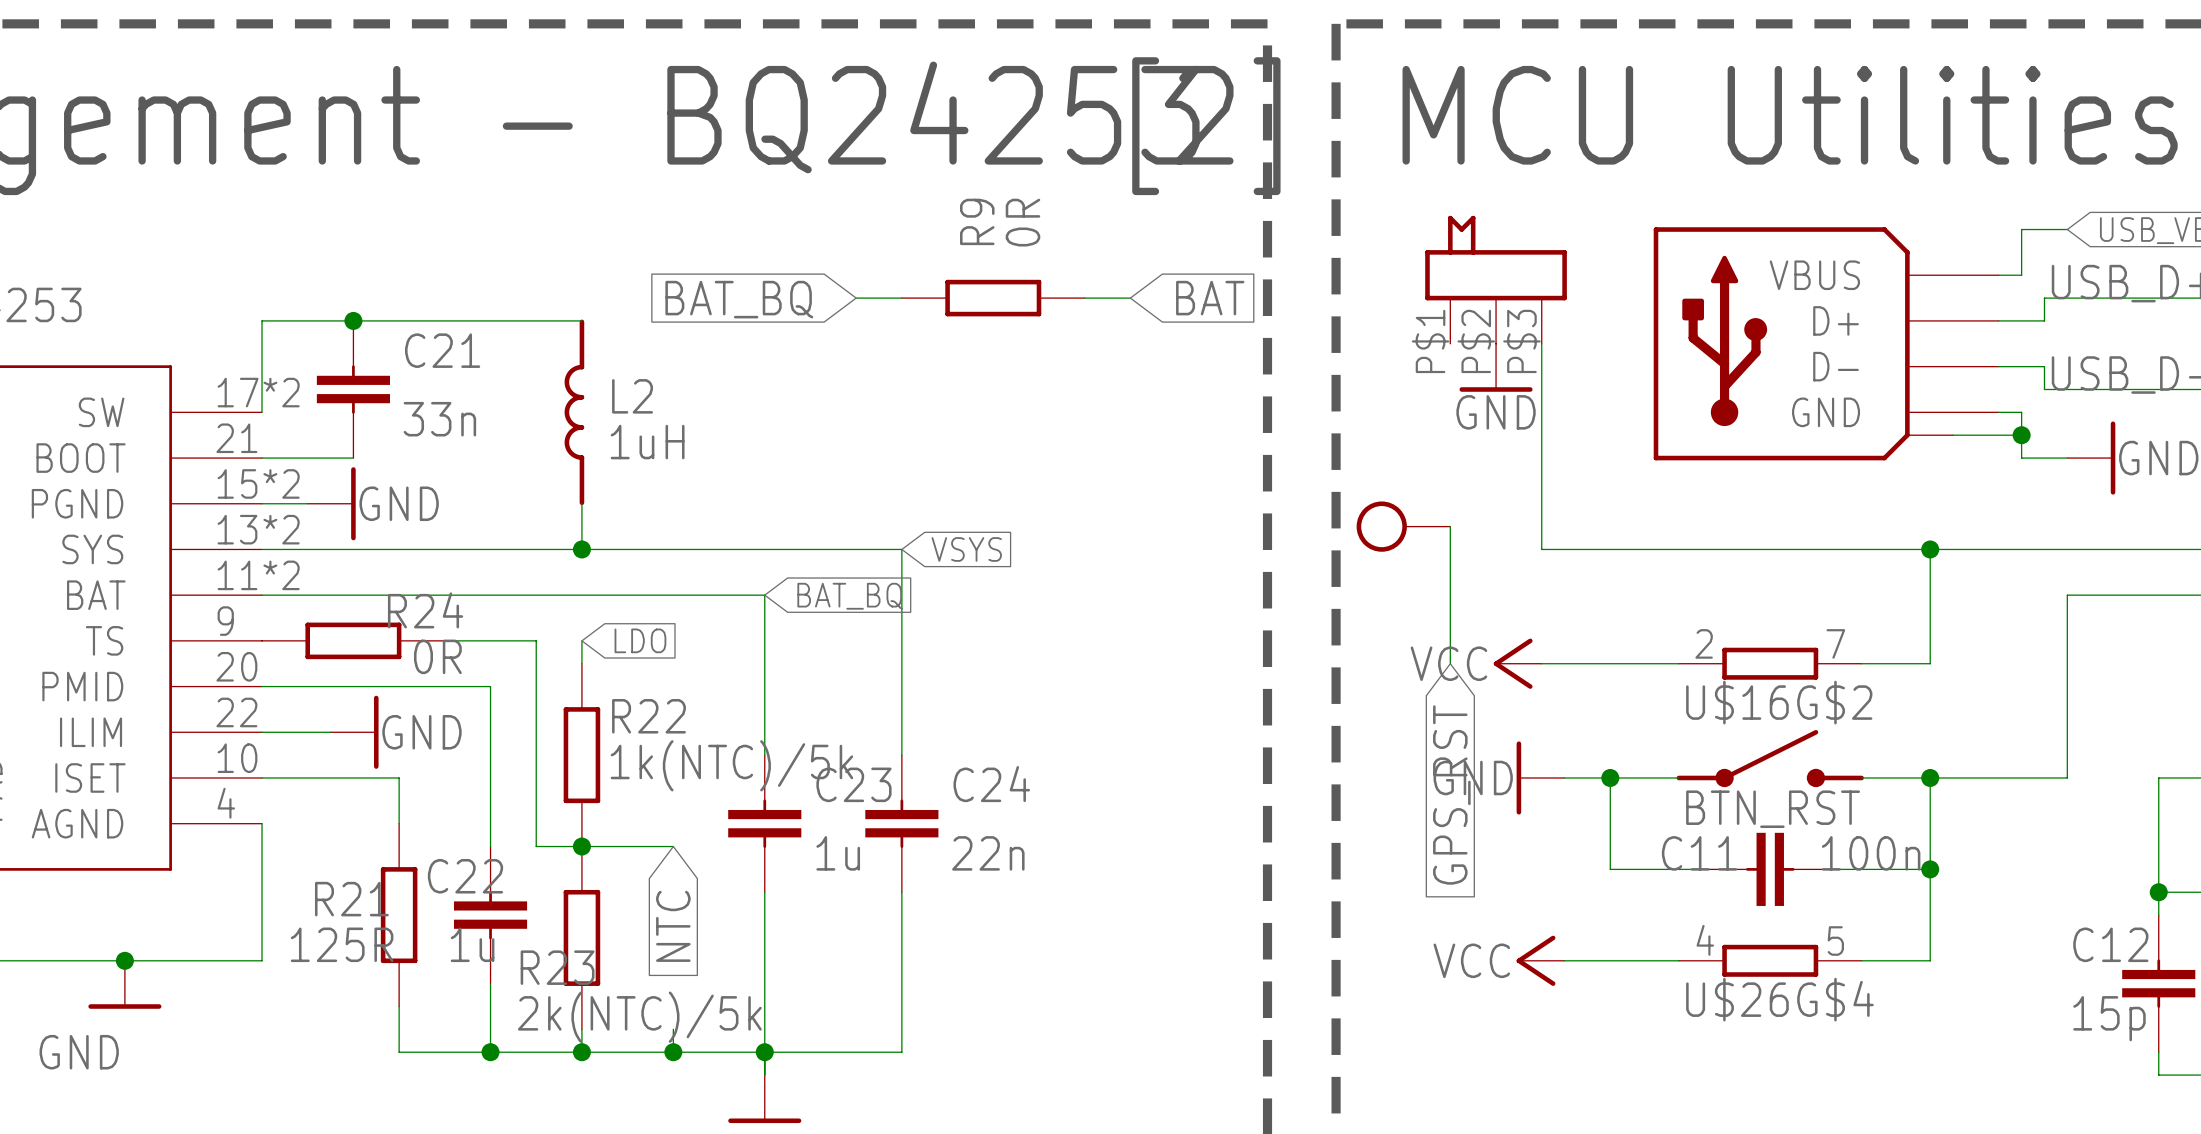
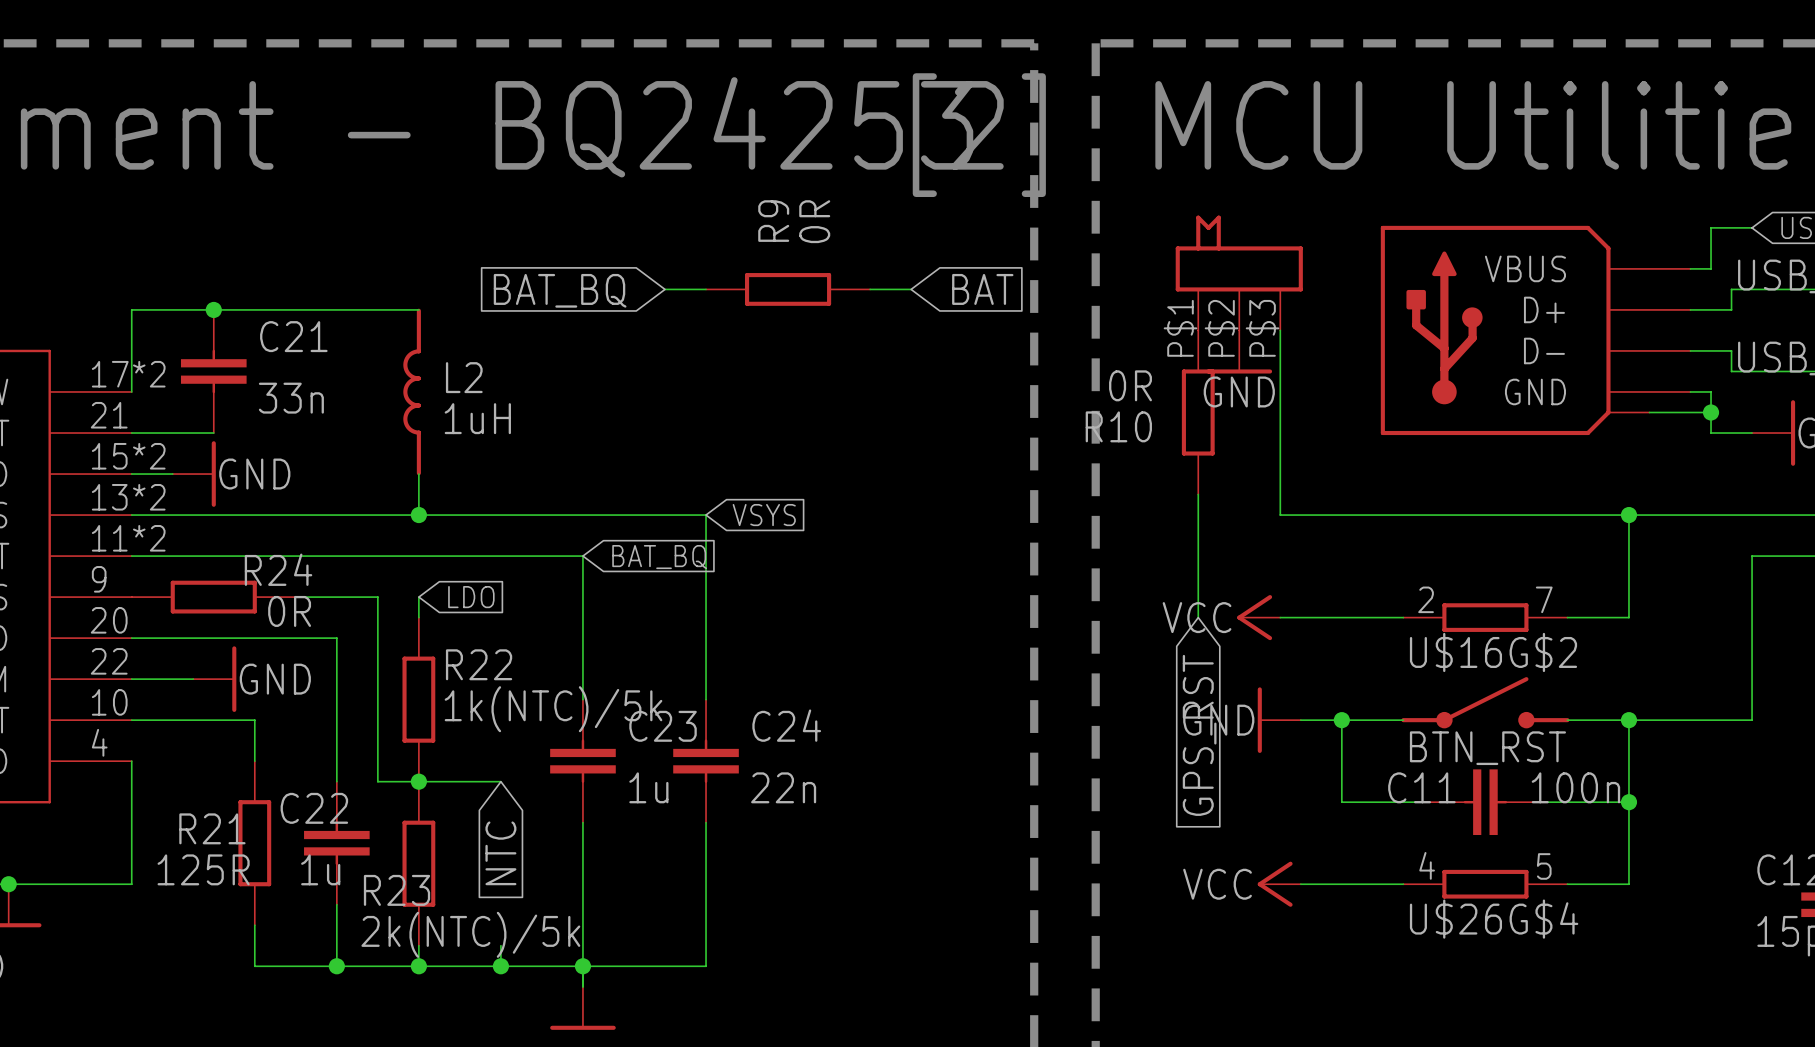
R10: none -> 0R (1198, 412)
part: (1403, 526) -> none

